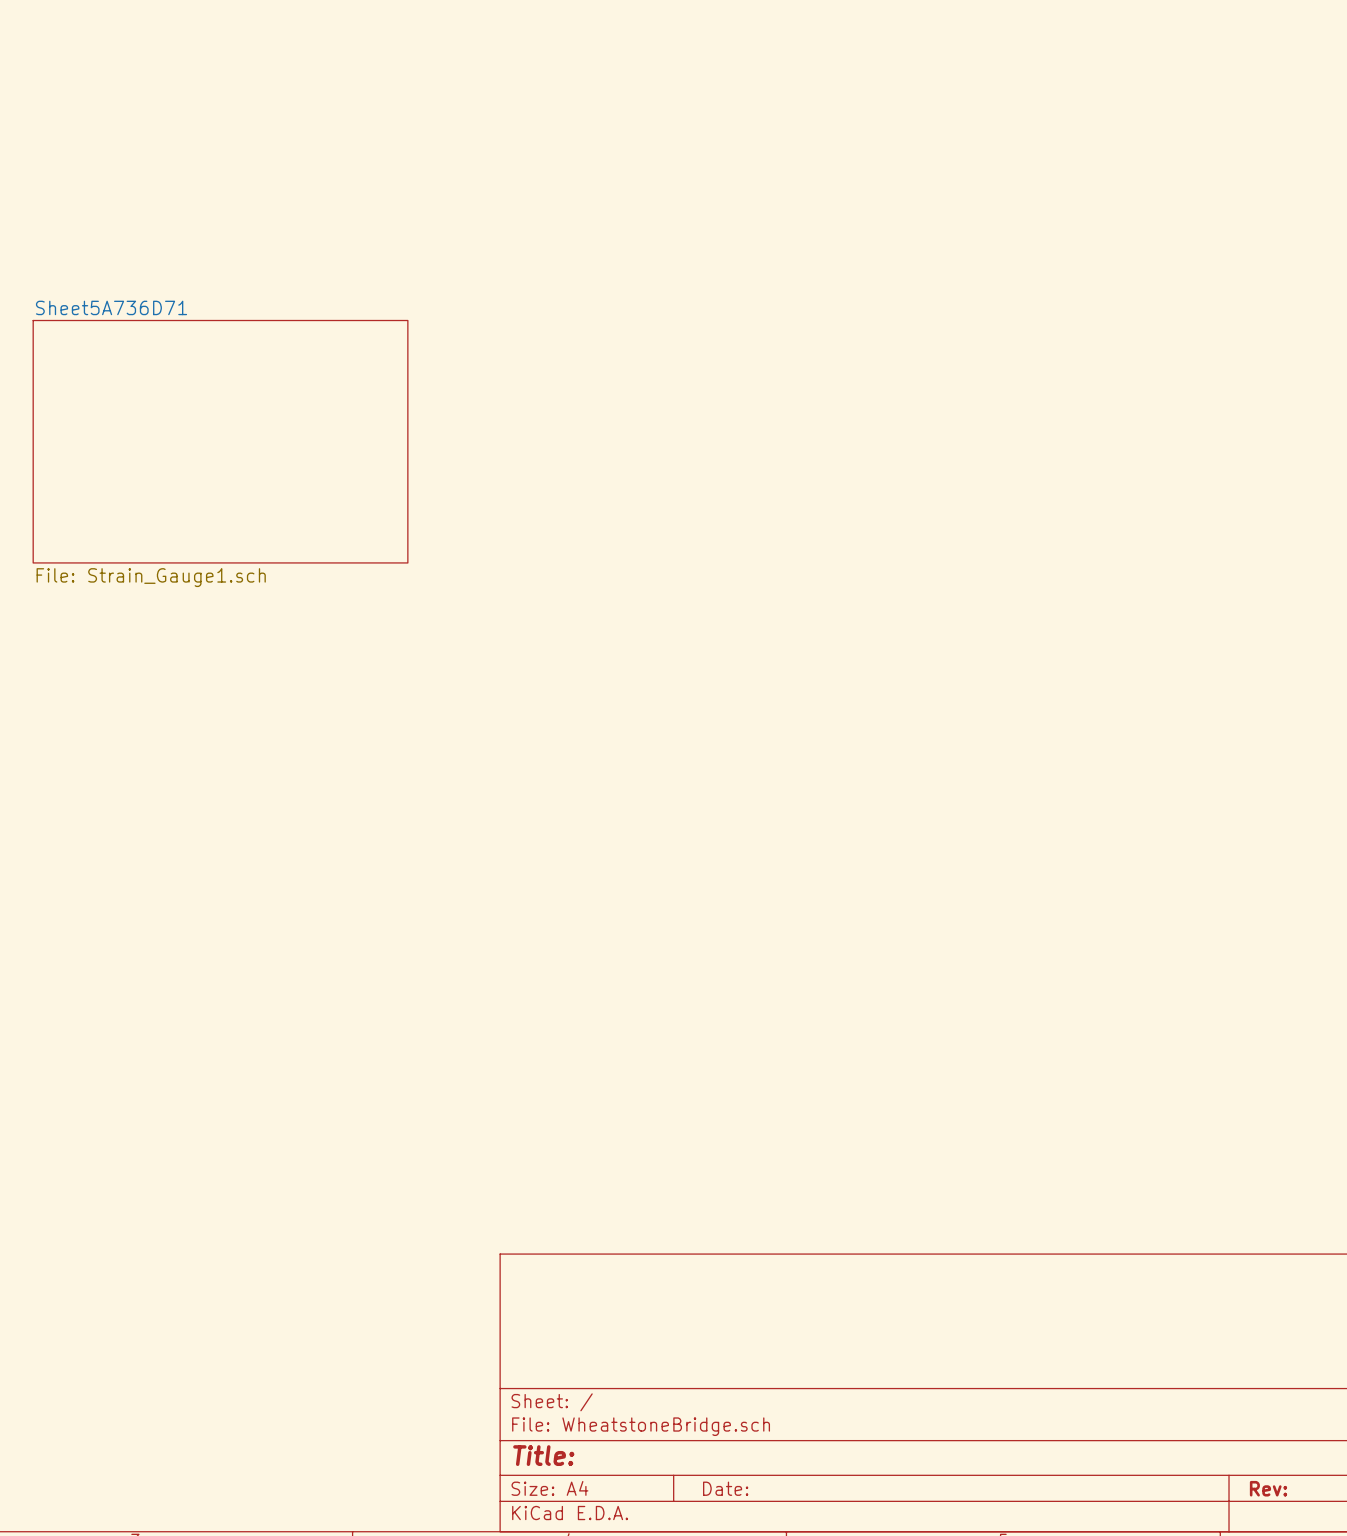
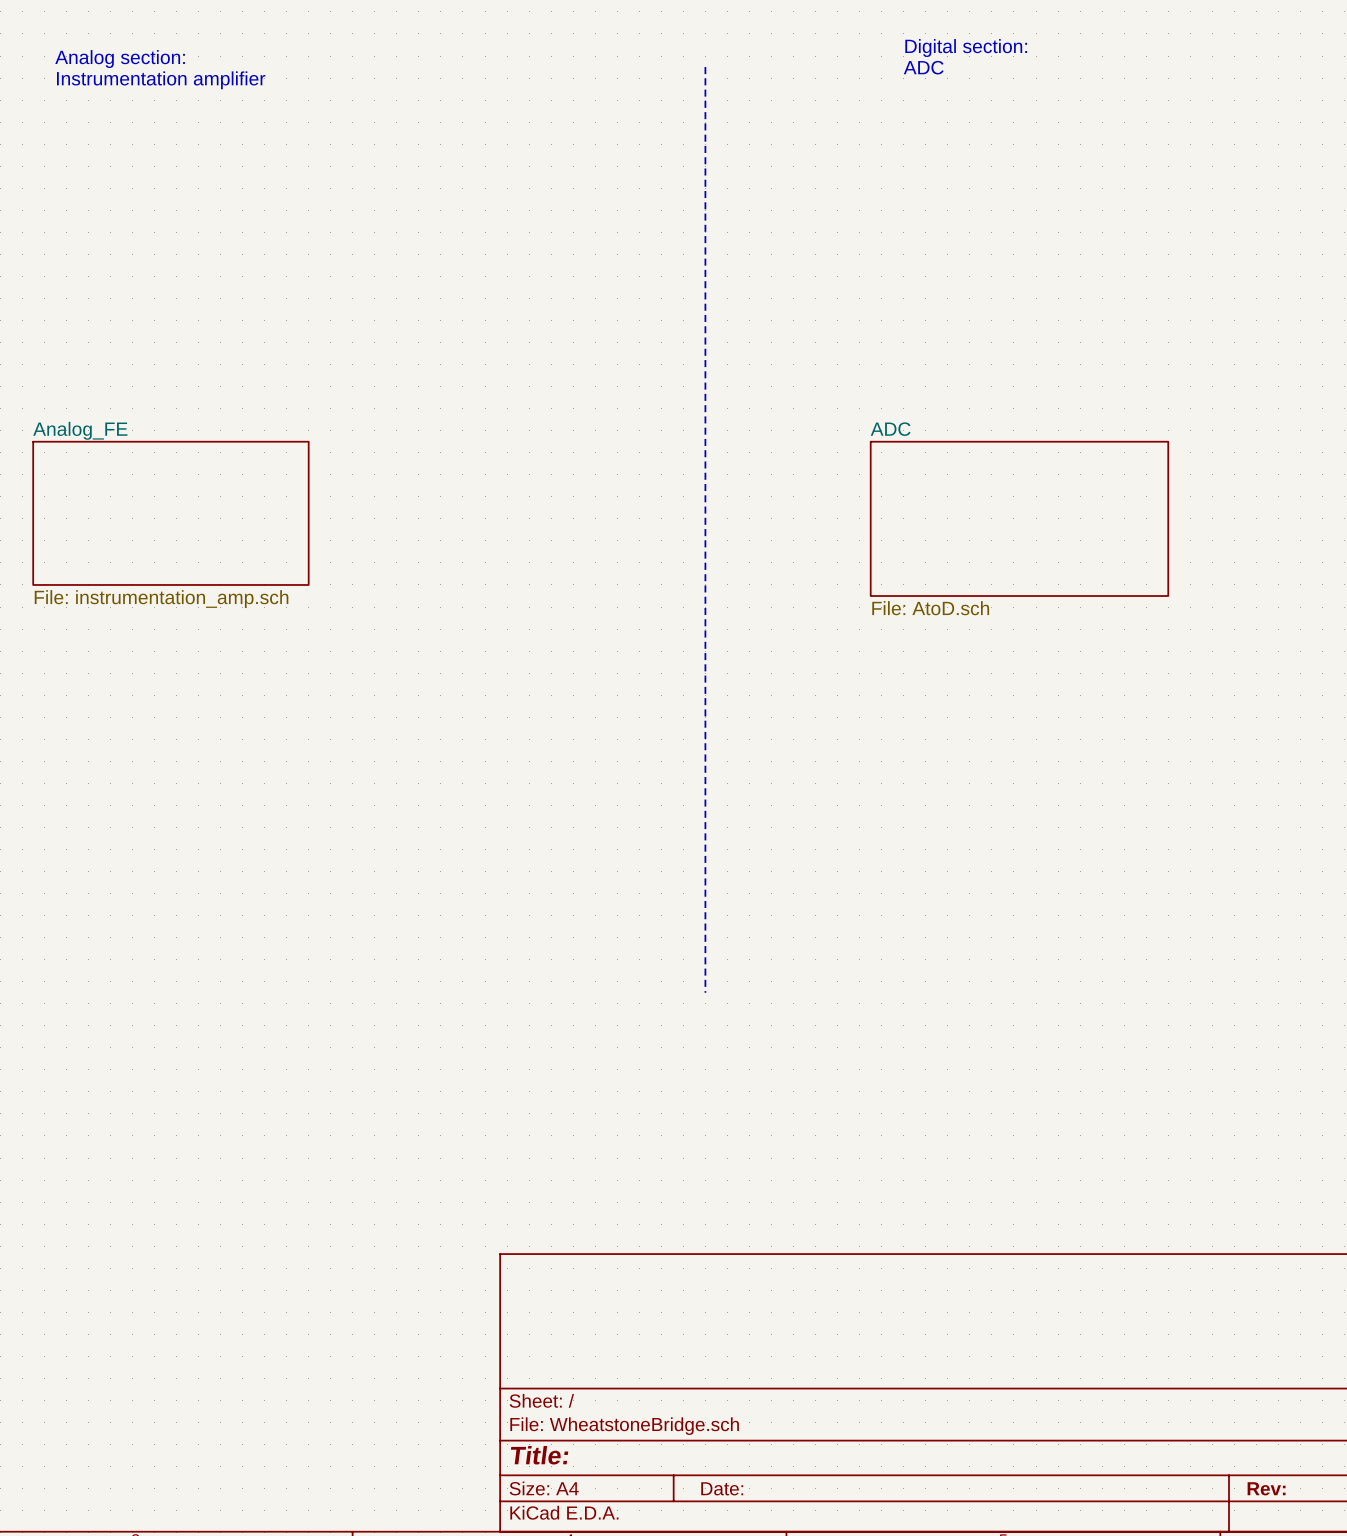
text: none -> Digital section: (966, 48)
text: none -> Analog section: (120, 59)
line: none -> (705, 67) (705, 992)
text: none -> ADC (923, 67)
text: none -> Instrumentation amplifier (161, 80)
sheet Sheet5A736D71: File: Strain_Gauge1.sch (220, 441) -> none
sheet Analog_FE: none -> File: instrumentation_amp.sch (170, 513)
sheet ADC: none -> File: AtoD.sch (1019, 518)

